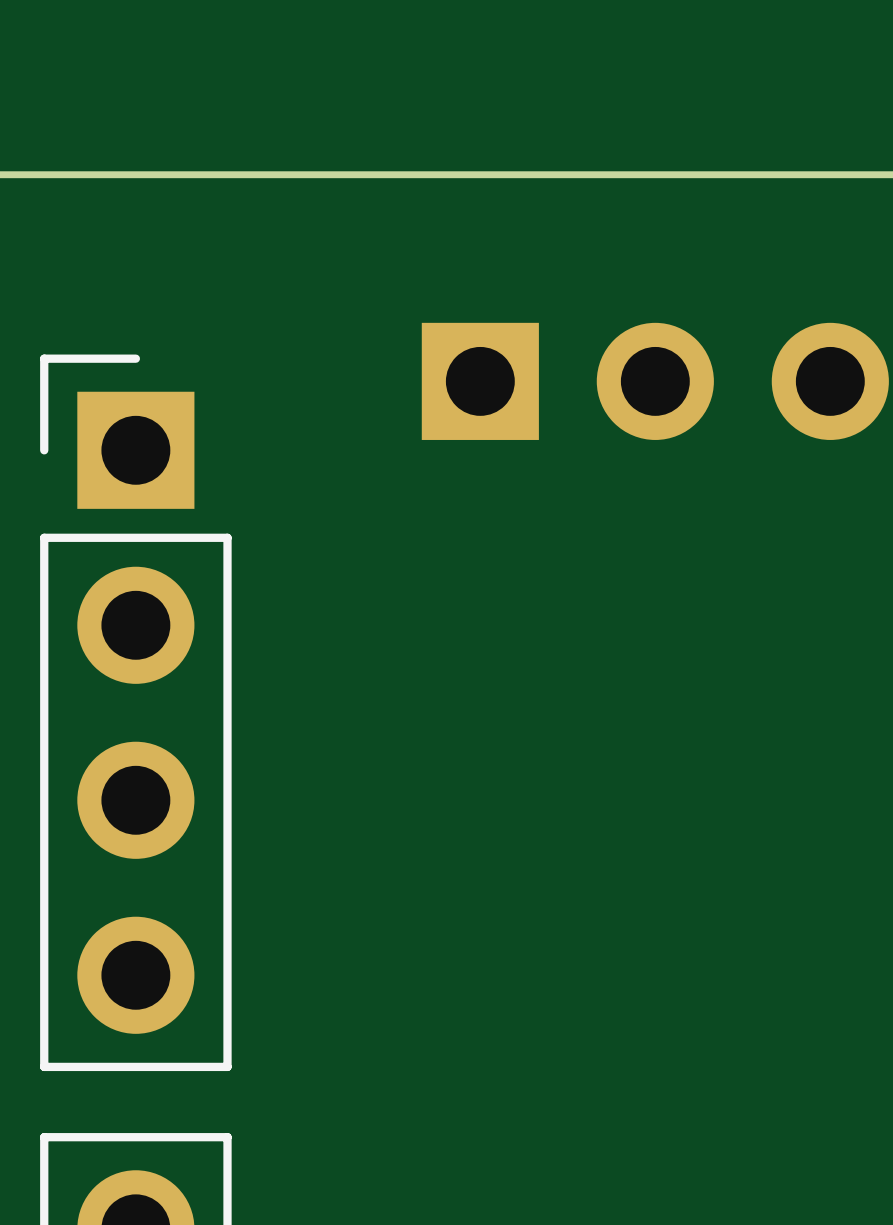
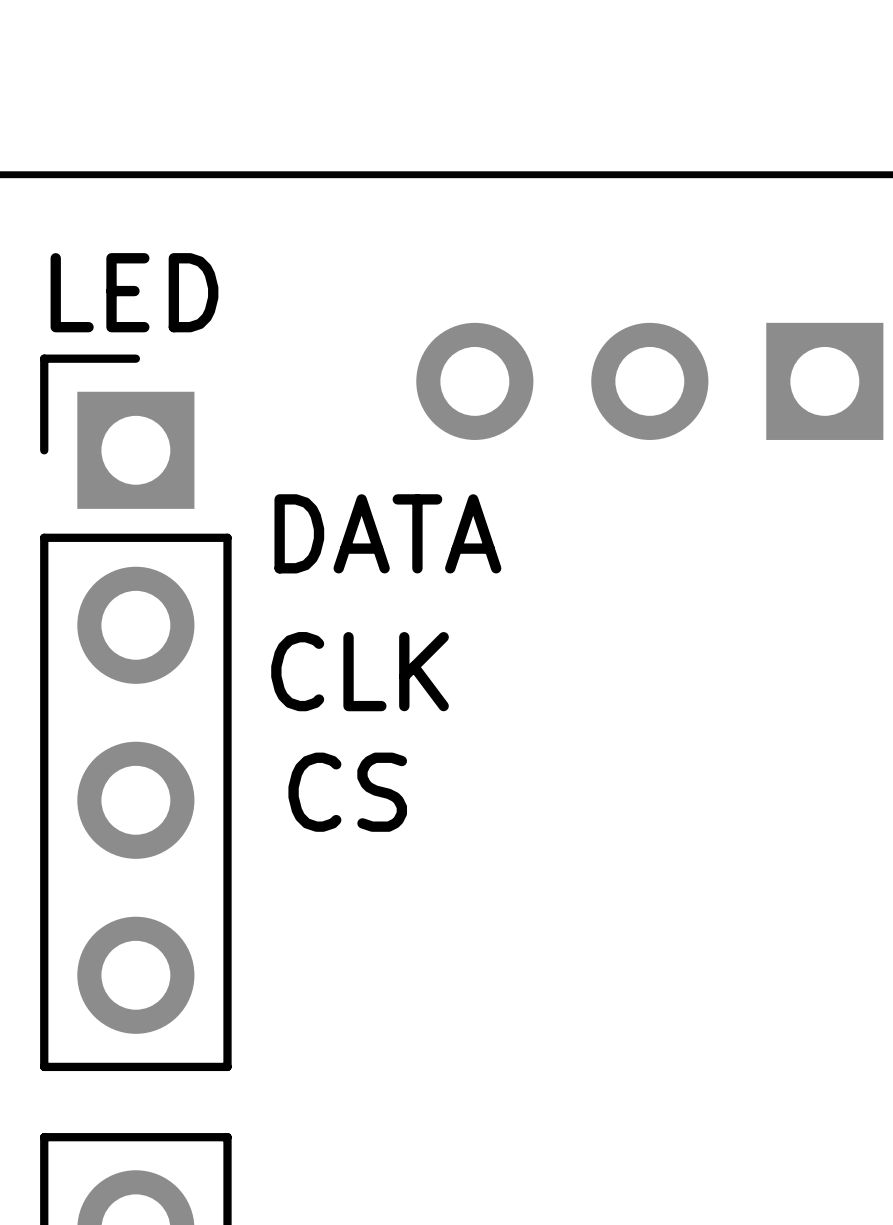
text: none -> LED (134, 292)
part rotation: 0° (655, 381) -> 180° (649, 381)
text: none -> DATA (387, 533)
text: none -> CLK (360, 671)
text: none -> CS (347, 792)

